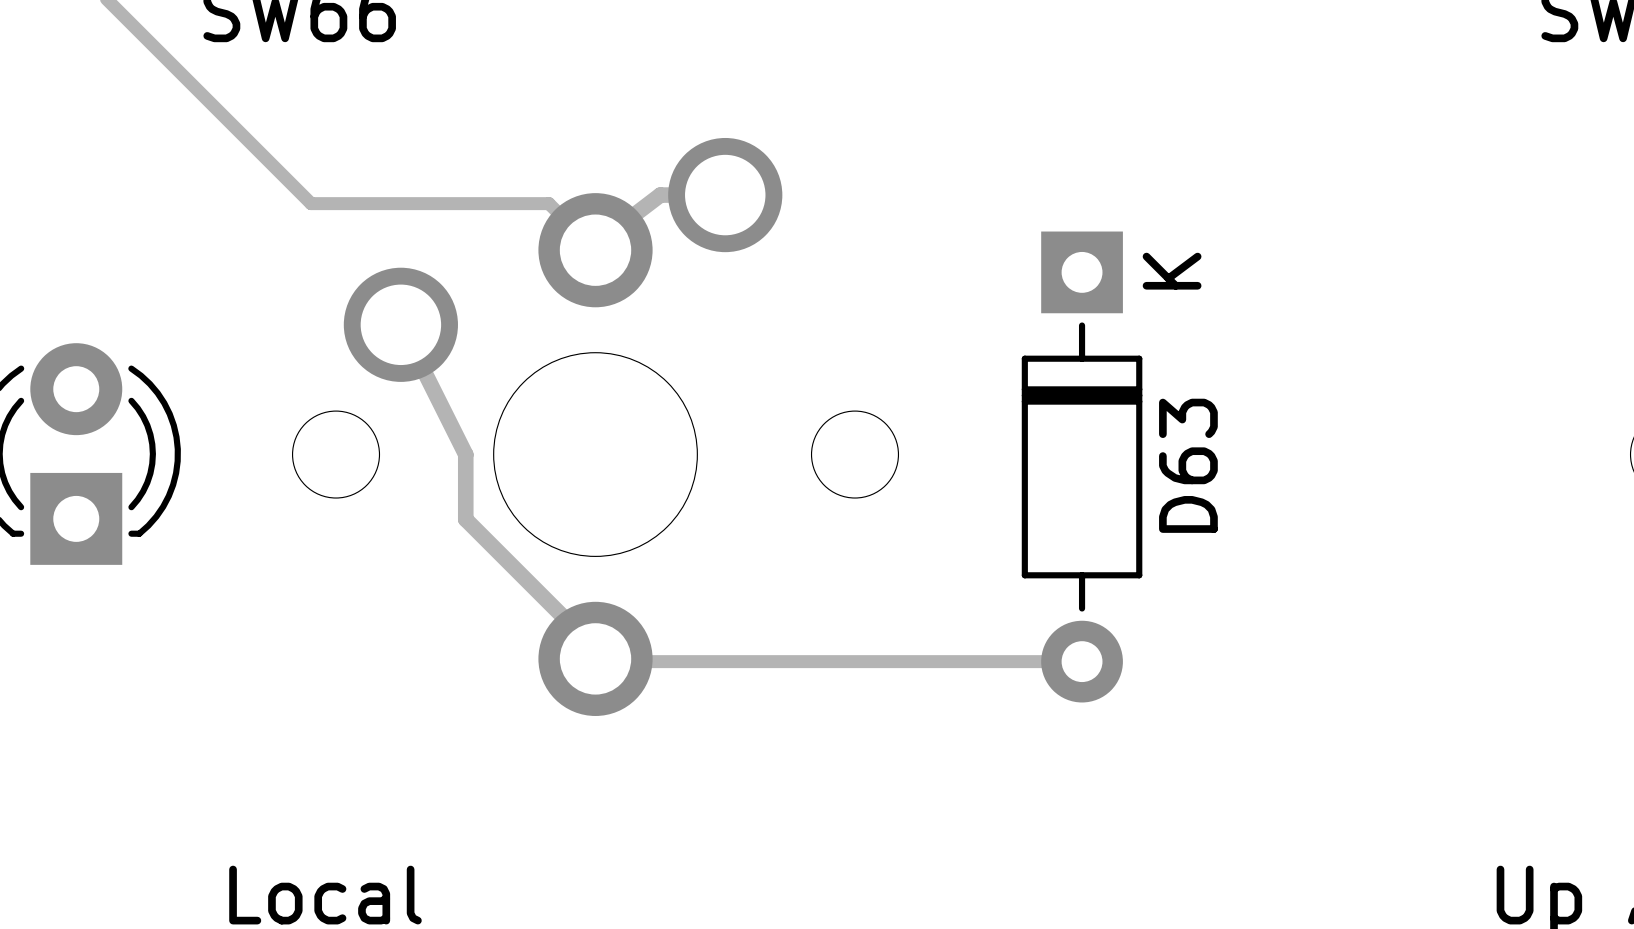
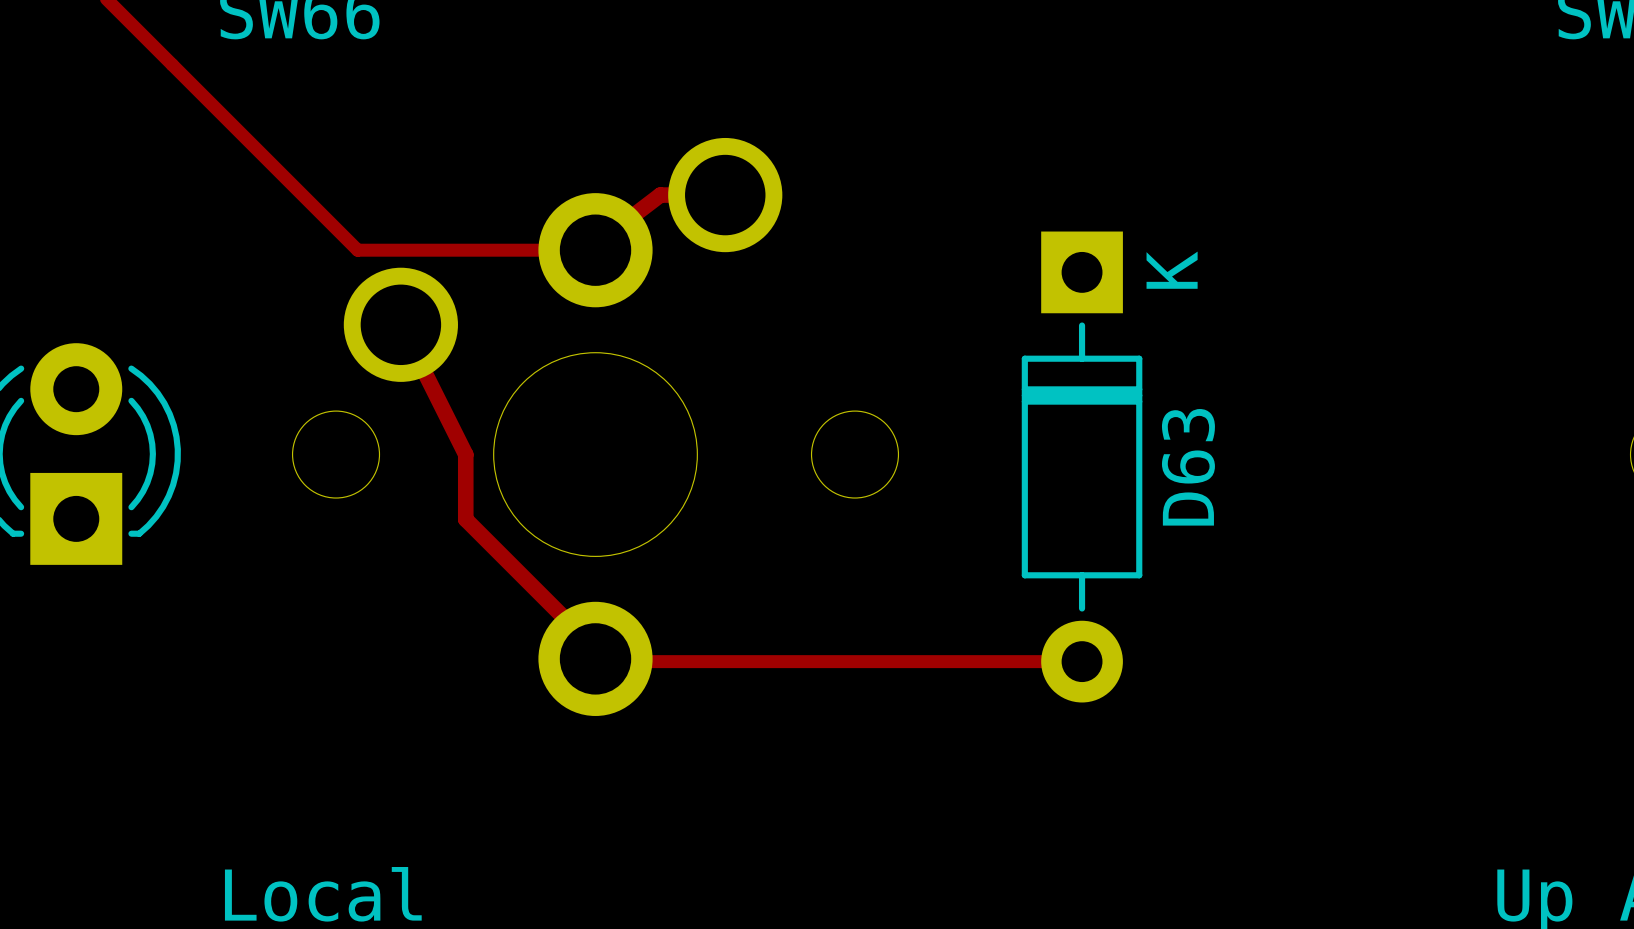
track: (311, 203) (548, 203) (595, 250) -> (311, 203) (357, 250) (595, 250)

